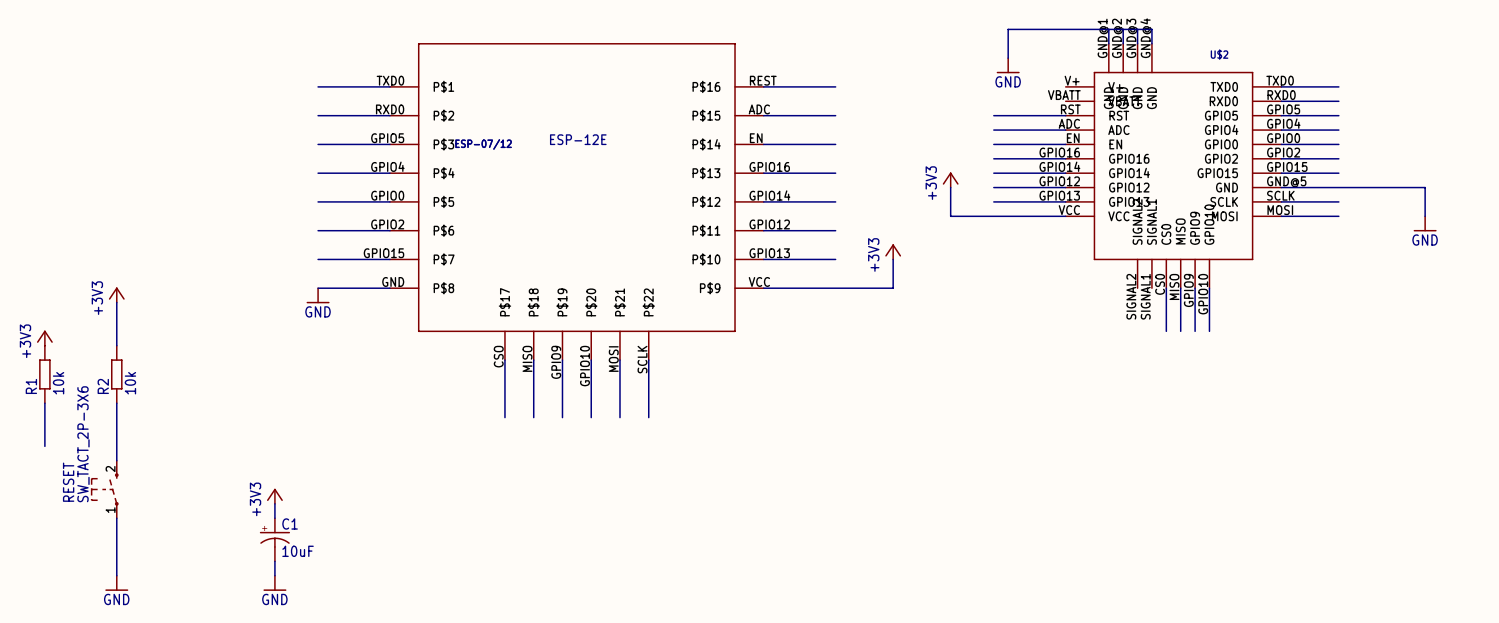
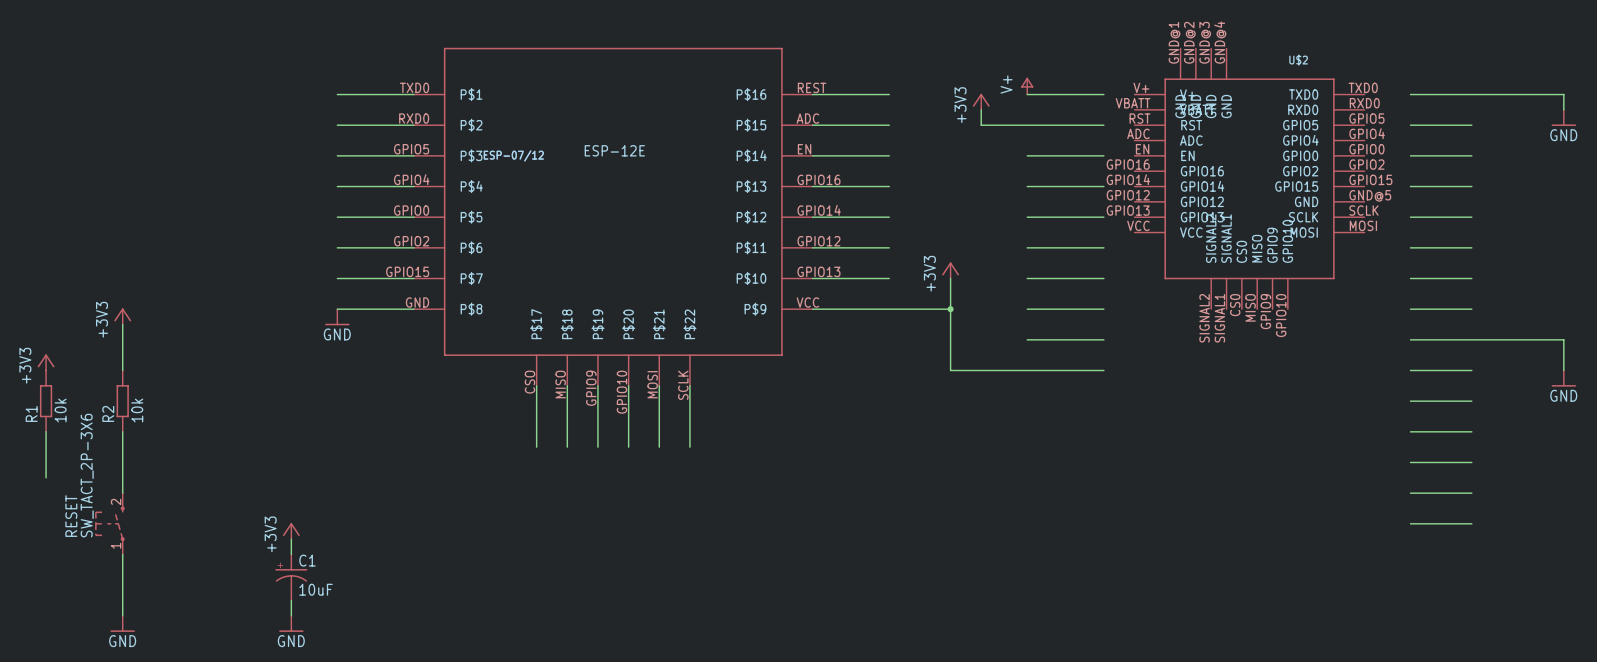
wire: (1108, 29) (1108, 43) -> none
wire: (1123, 29) (1123, 43) -> none
wire: (1137, 29) (1137, 43) -> none
wire: (1151, 43) (1151, 29) (1008, 29) (1008, 58) -> none
power symbol: GND (1008, 65) -> none
power symbol: none -> V+ (1027, 86)
wire: none -> (1027, 94) (1103, 94)
wire: (1281, 86) (1324, 86) -> none
wire: none -> (1425, 94) (1563, 94) (1563, 109)
wire: none -> (981, 109) (981, 125) (1057, 125)
wire: (1281, 101) (1338, 101) -> (1410, 247) (1471, 247)
power symbol: none -> GND (1563, 117)
wire: (1036, 115) (1065, 115) -> none
wire: (1281, 115) (1324, 115) -> (1425, 125) (1471, 125)
wire: (993, 130) (1065, 130) -> (1027, 247) (1103, 247)
wire: (1281, 130) (1338, 130) -> (1410, 278) (1471, 278)
wire: (1036, 144) (1065, 144) -> (1027, 155) (1057, 155)
wire: (1281, 144) (1324, 144) -> (1425, 155) (1471, 155)
wire: (993, 158) (1065, 158) -> (1027, 278) (1103, 278)
wire: (1281, 158) (1338, 158) -> (1410, 309) (1471, 309)
wire: (1036, 173) (1065, 173) -> (1027, 186) (1057, 186)
wire: (1281, 173) (1324, 173) -> (1425, 186) (1471, 186)
power symbol position: +3V3 (950, 180) -> +3V3 (981, 101)
wire: (950, 187) (950, 216) (1065, 216) -> none
wire: (993, 187) (1065, 187) -> (1027, 309) (1103, 309)
wire: (1281, 187) (1425, 187) (1425, 216) -> (1410, 339) (1563, 339) (1563, 370)
wire: (1036, 201) (1065, 201) -> (1027, 217) (1057, 217)
wire: (1281, 201) (1324, 201) -> (1425, 217) (1471, 217)
wire: (1281, 216) (1338, 216) -> (1410, 370) (1471, 370)
power symbol: GND (1425, 223) -> none
wire: none -> (950, 309) (950, 370) (1103, 370)
junction: none -> (950, 309)
wire: (1166, 288) (1166, 331) -> none
wire: (1180, 288) (1180, 331) -> none
wire: (1195, 288) (1195, 331) -> none
wire: (1209, 288) (1209, 331) -> none
wire: none -> (1027, 339) (1103, 339)
power symbol: none -> GND (1563, 378)
wire: none -> (1410, 401) (1471, 401)
wire: none -> (1410, 431) (1471, 431)
wire: none -> (1410, 462) (1471, 462)
wire: none -> (1410, 493) (1471, 493)
wire: none -> (1410, 523) (1471, 523)

